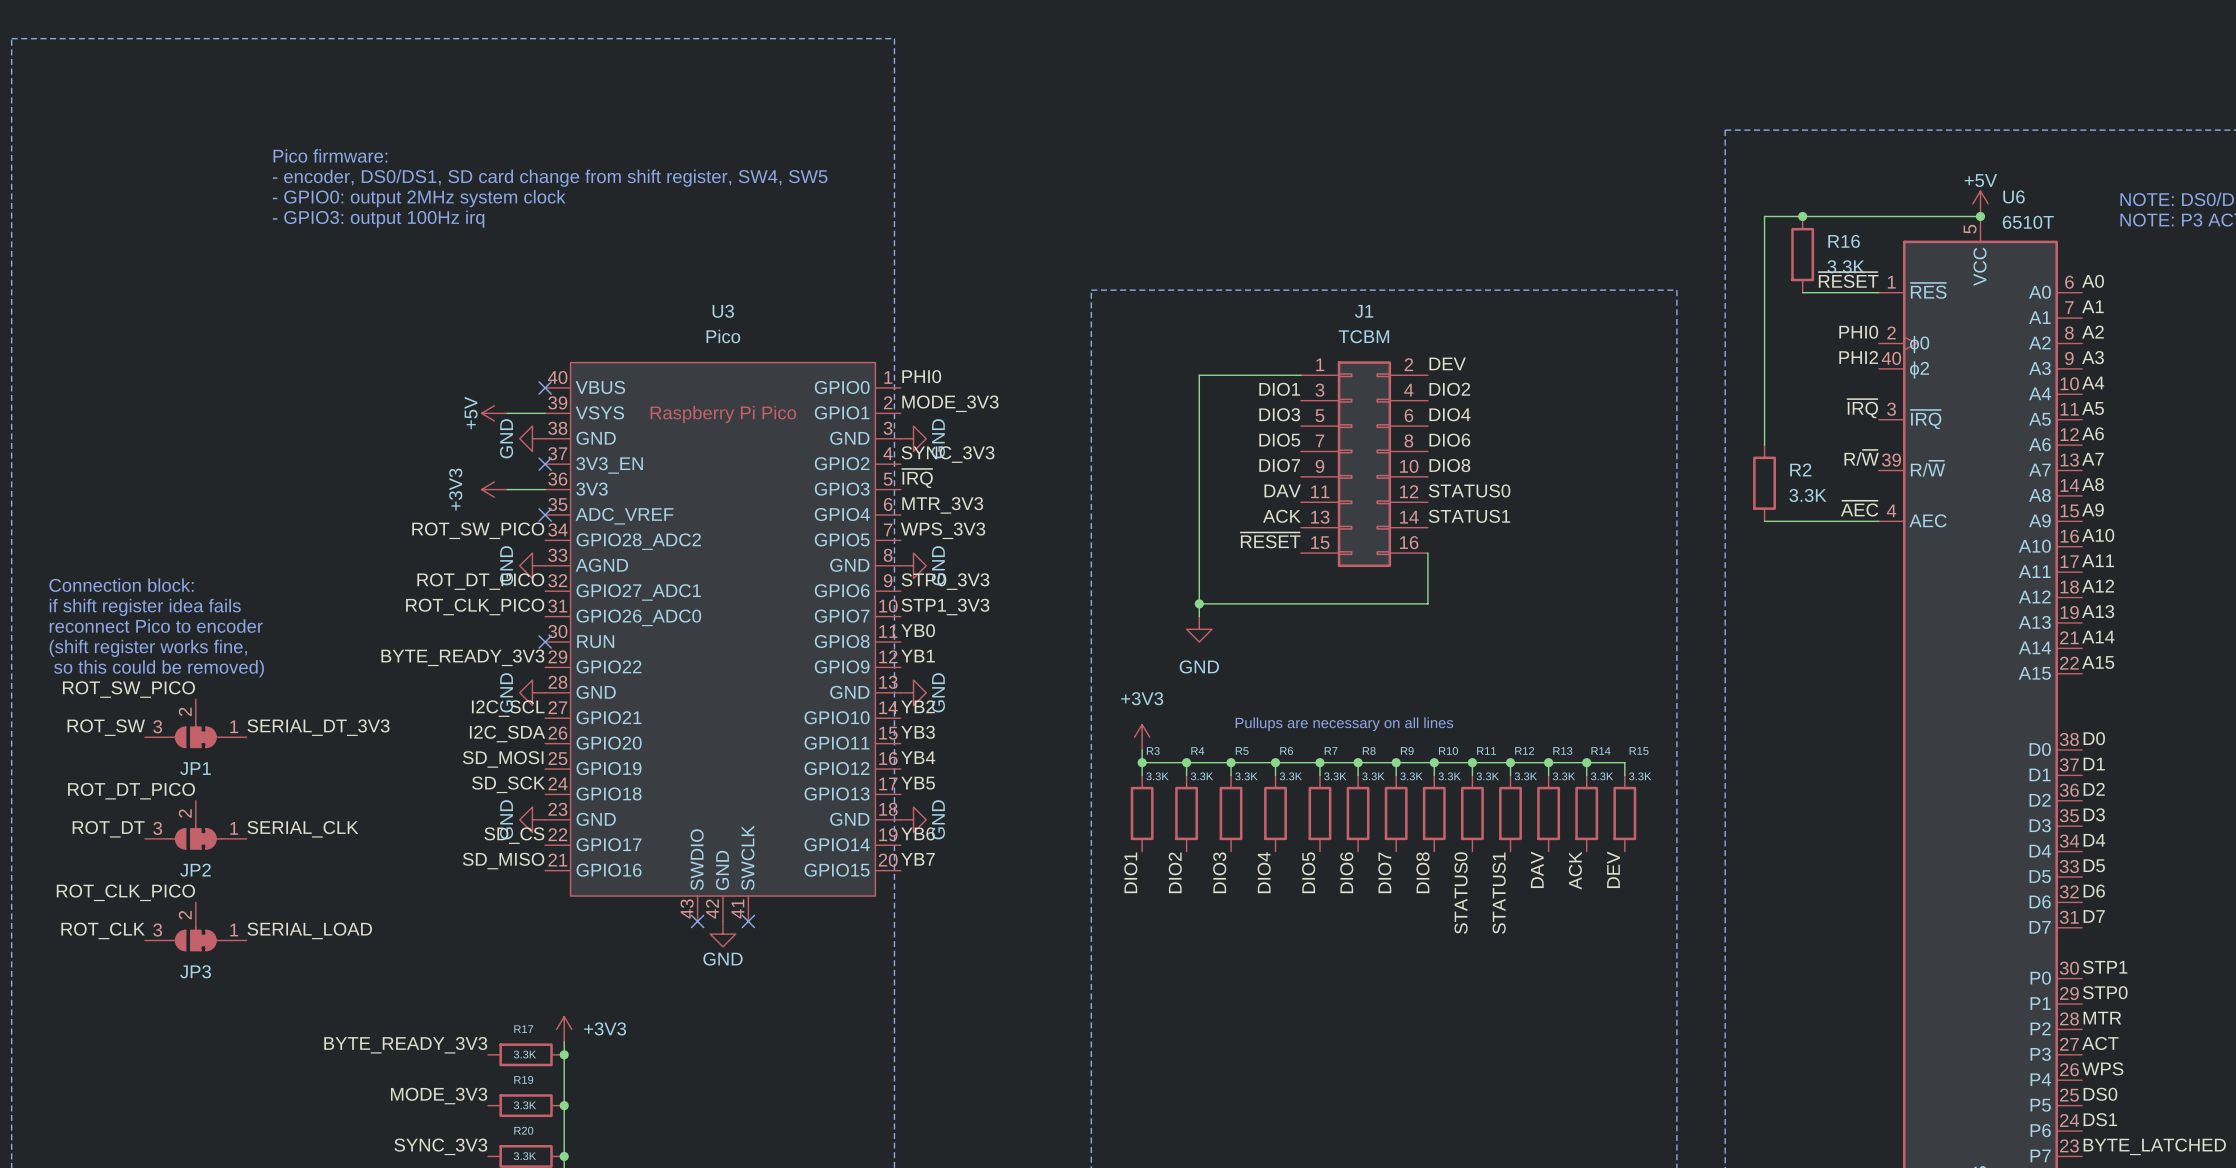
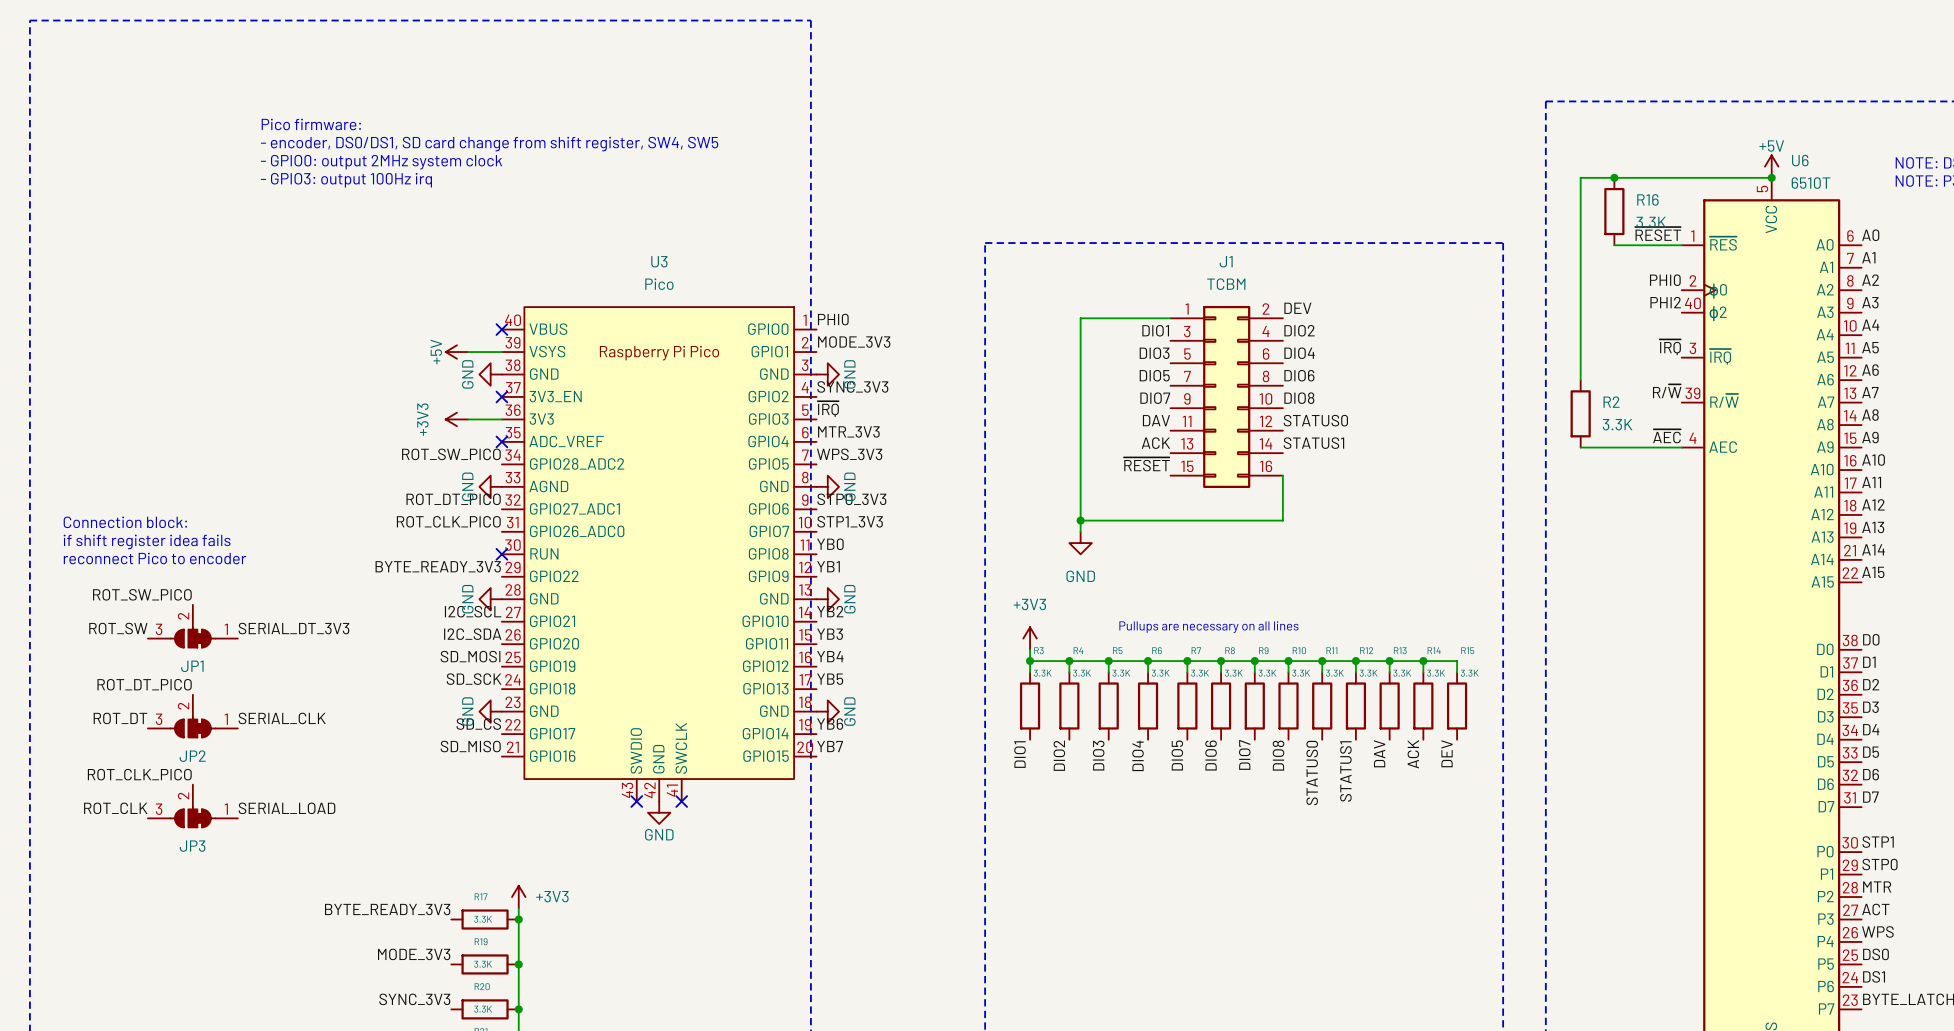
text: Connection block: (121, 585) -> none
text: if shift register idea fails (145, 607) -> Connection block: (125, 522)
text: reconnect Pico to encoder (156, 626) -> if shift register idea fails (147, 541)
text: (shift register works fine, (148, 648) -> reconnect Pico to encoder (155, 558)
text: so this could be removed) (159, 668) -> none

